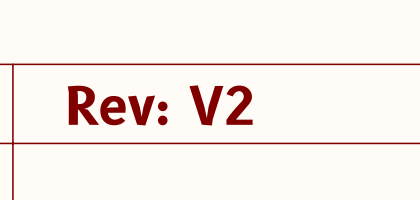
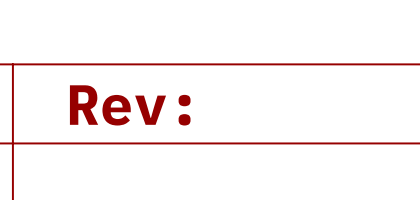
title block: Rev: V2 (160, 105) -> Rev: (130, 105)

